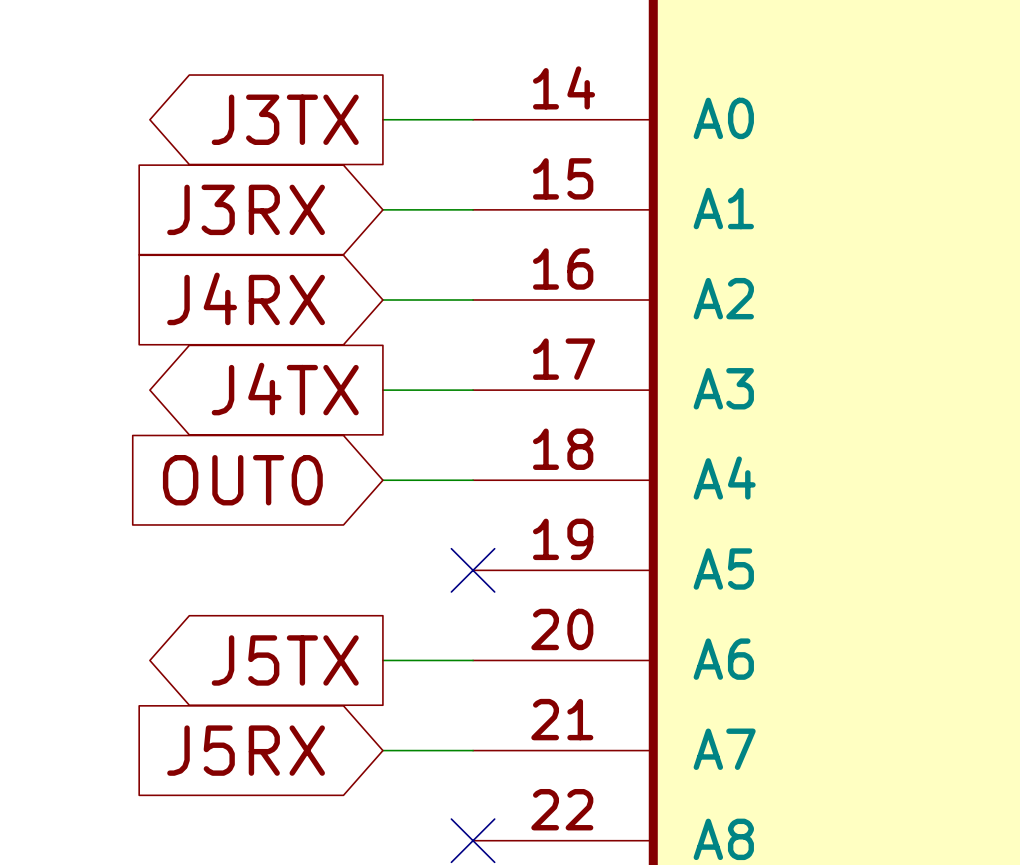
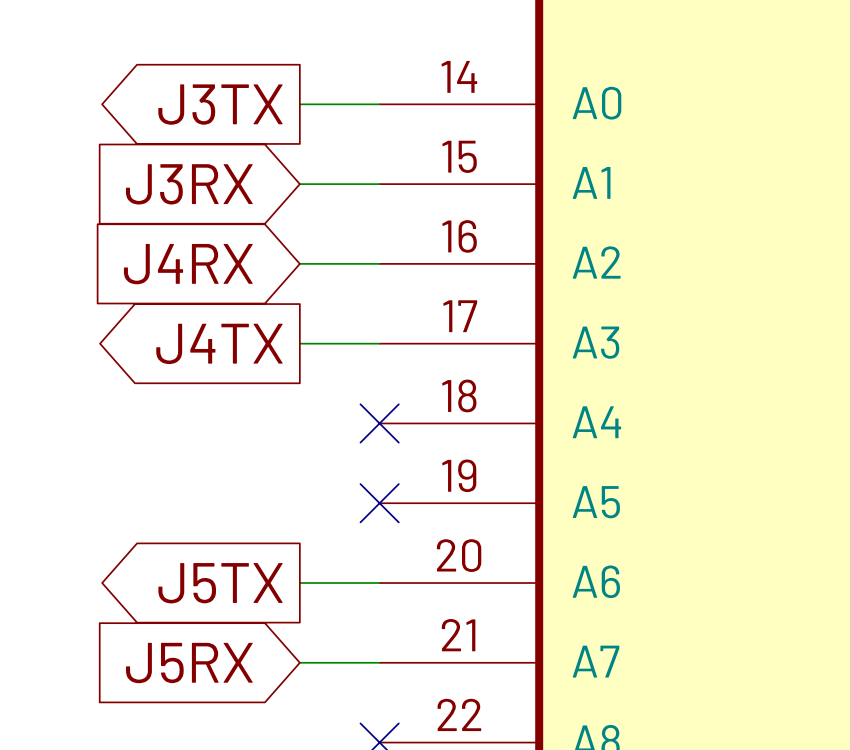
global label: OUT0 (242, 480) -> none
wire: (382, 480) (473, 480) -> none
no-connect mark: none -> (379, 423)

